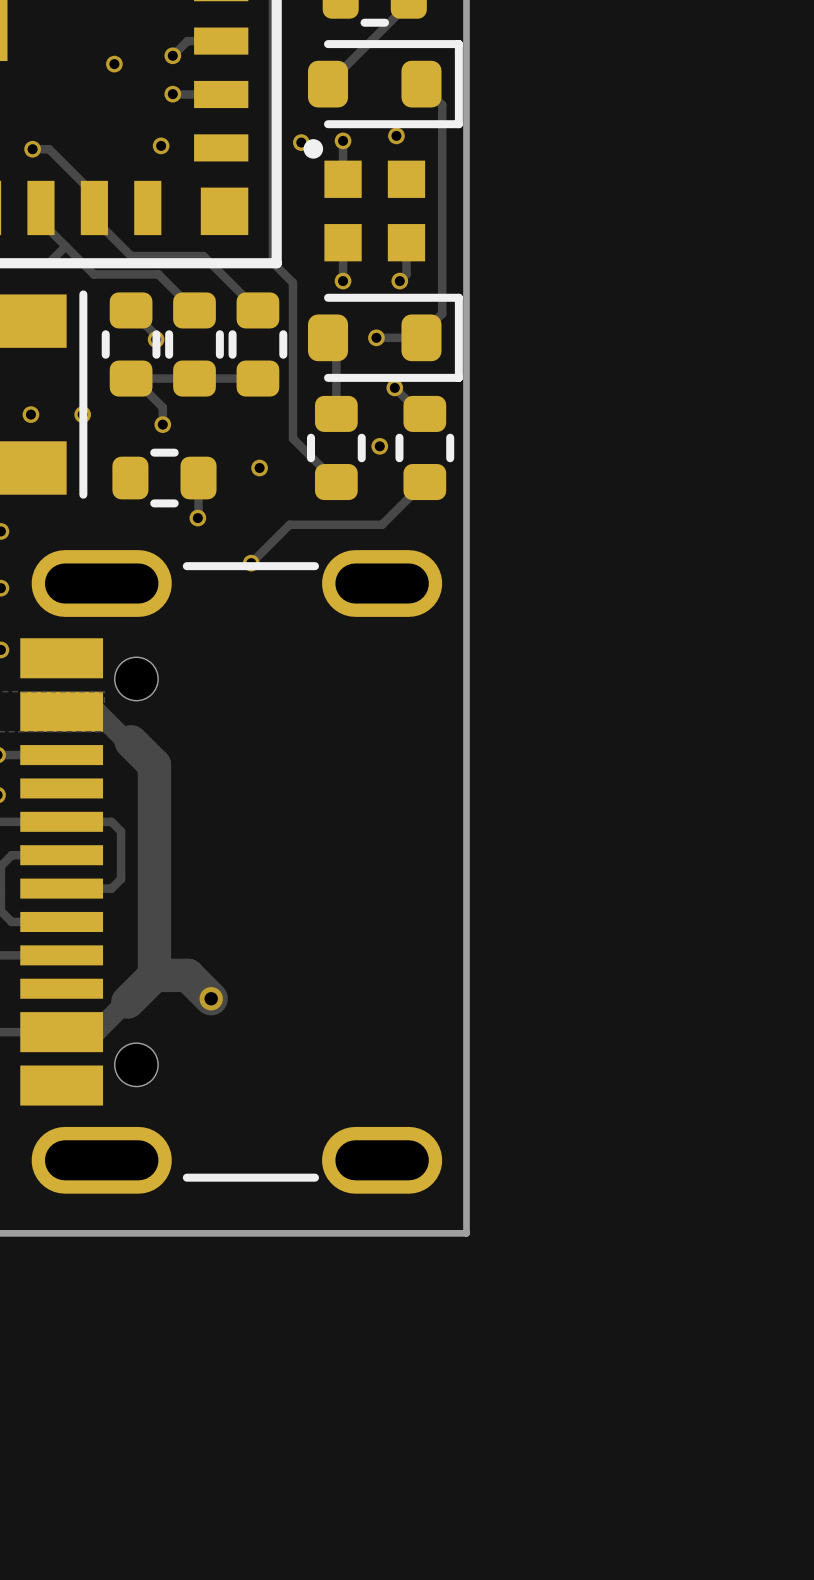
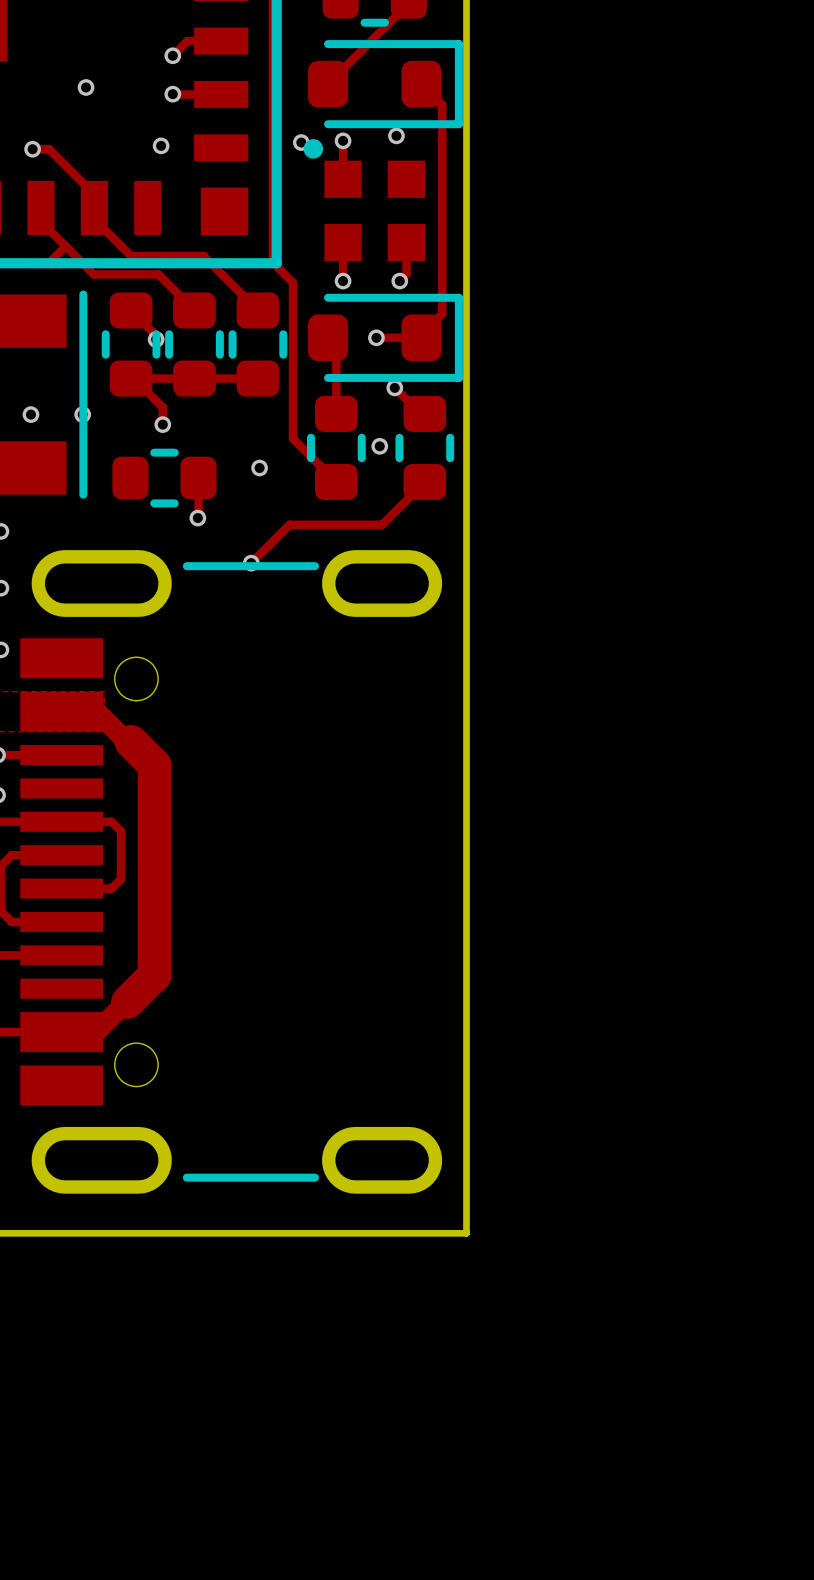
via position: (114, 64) -> (86, 87)
track: (154, 975) (187, 975) (211, 998) -> none
via: (211, 998) -> none

